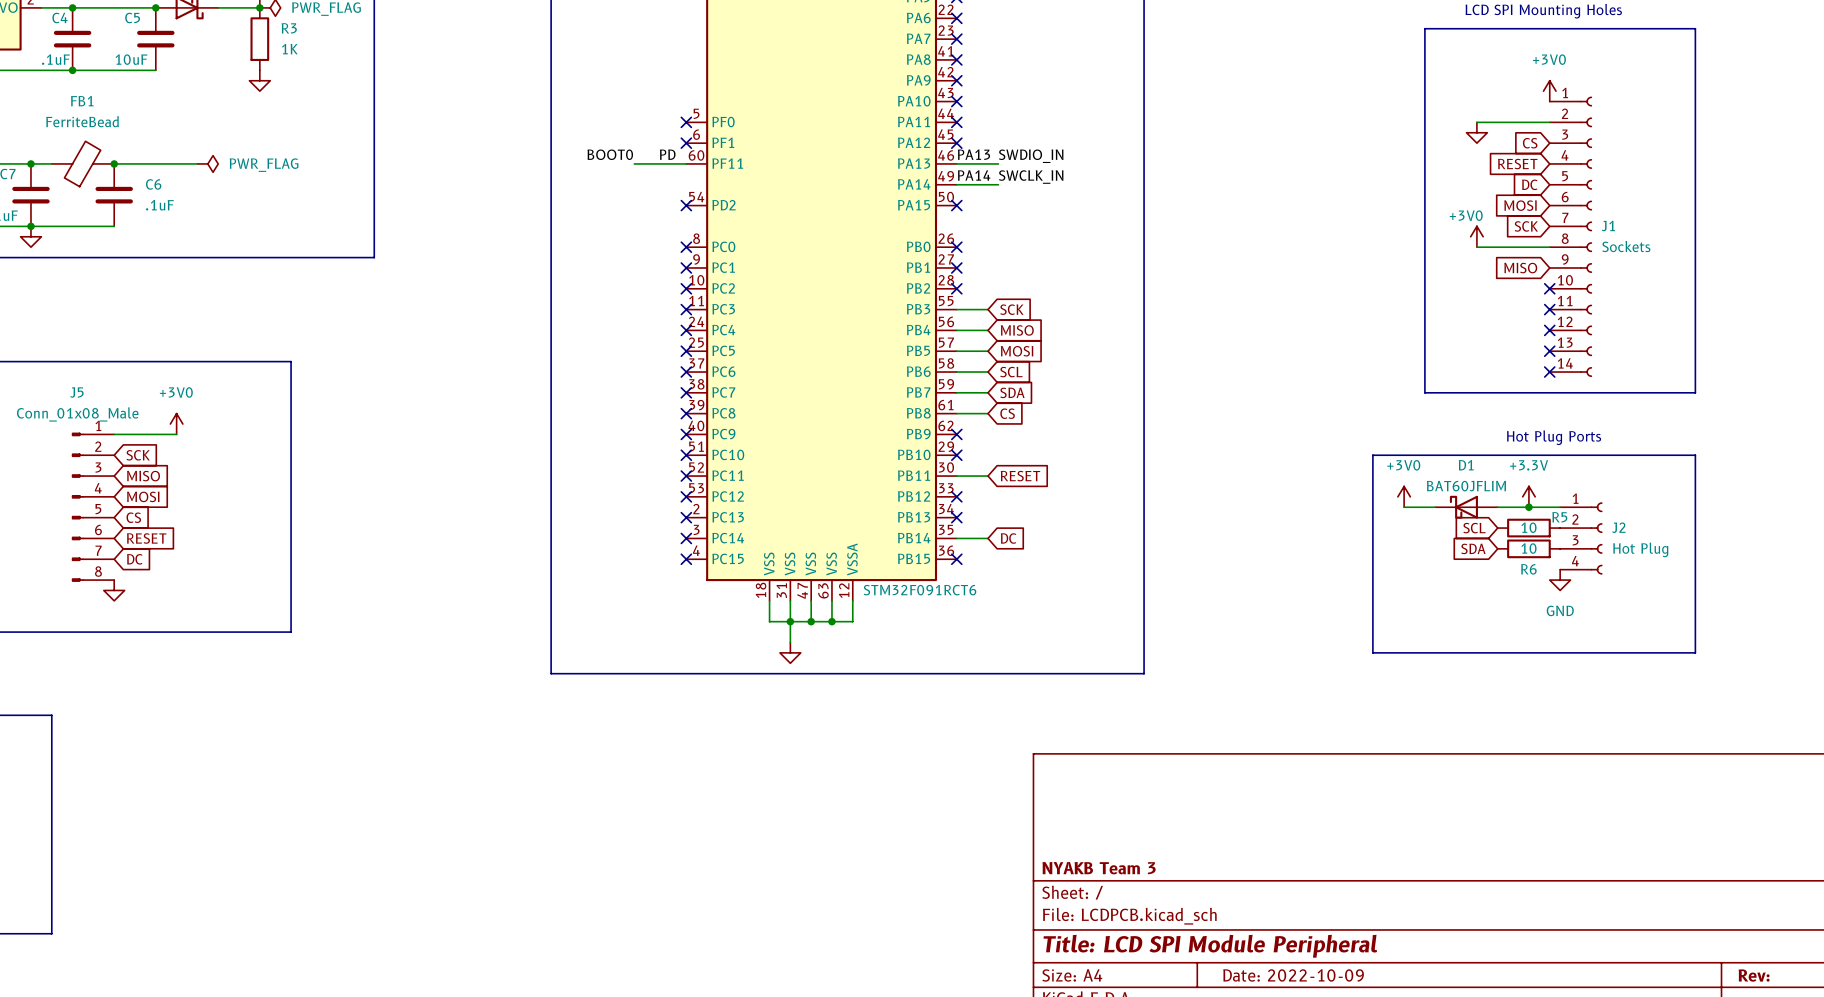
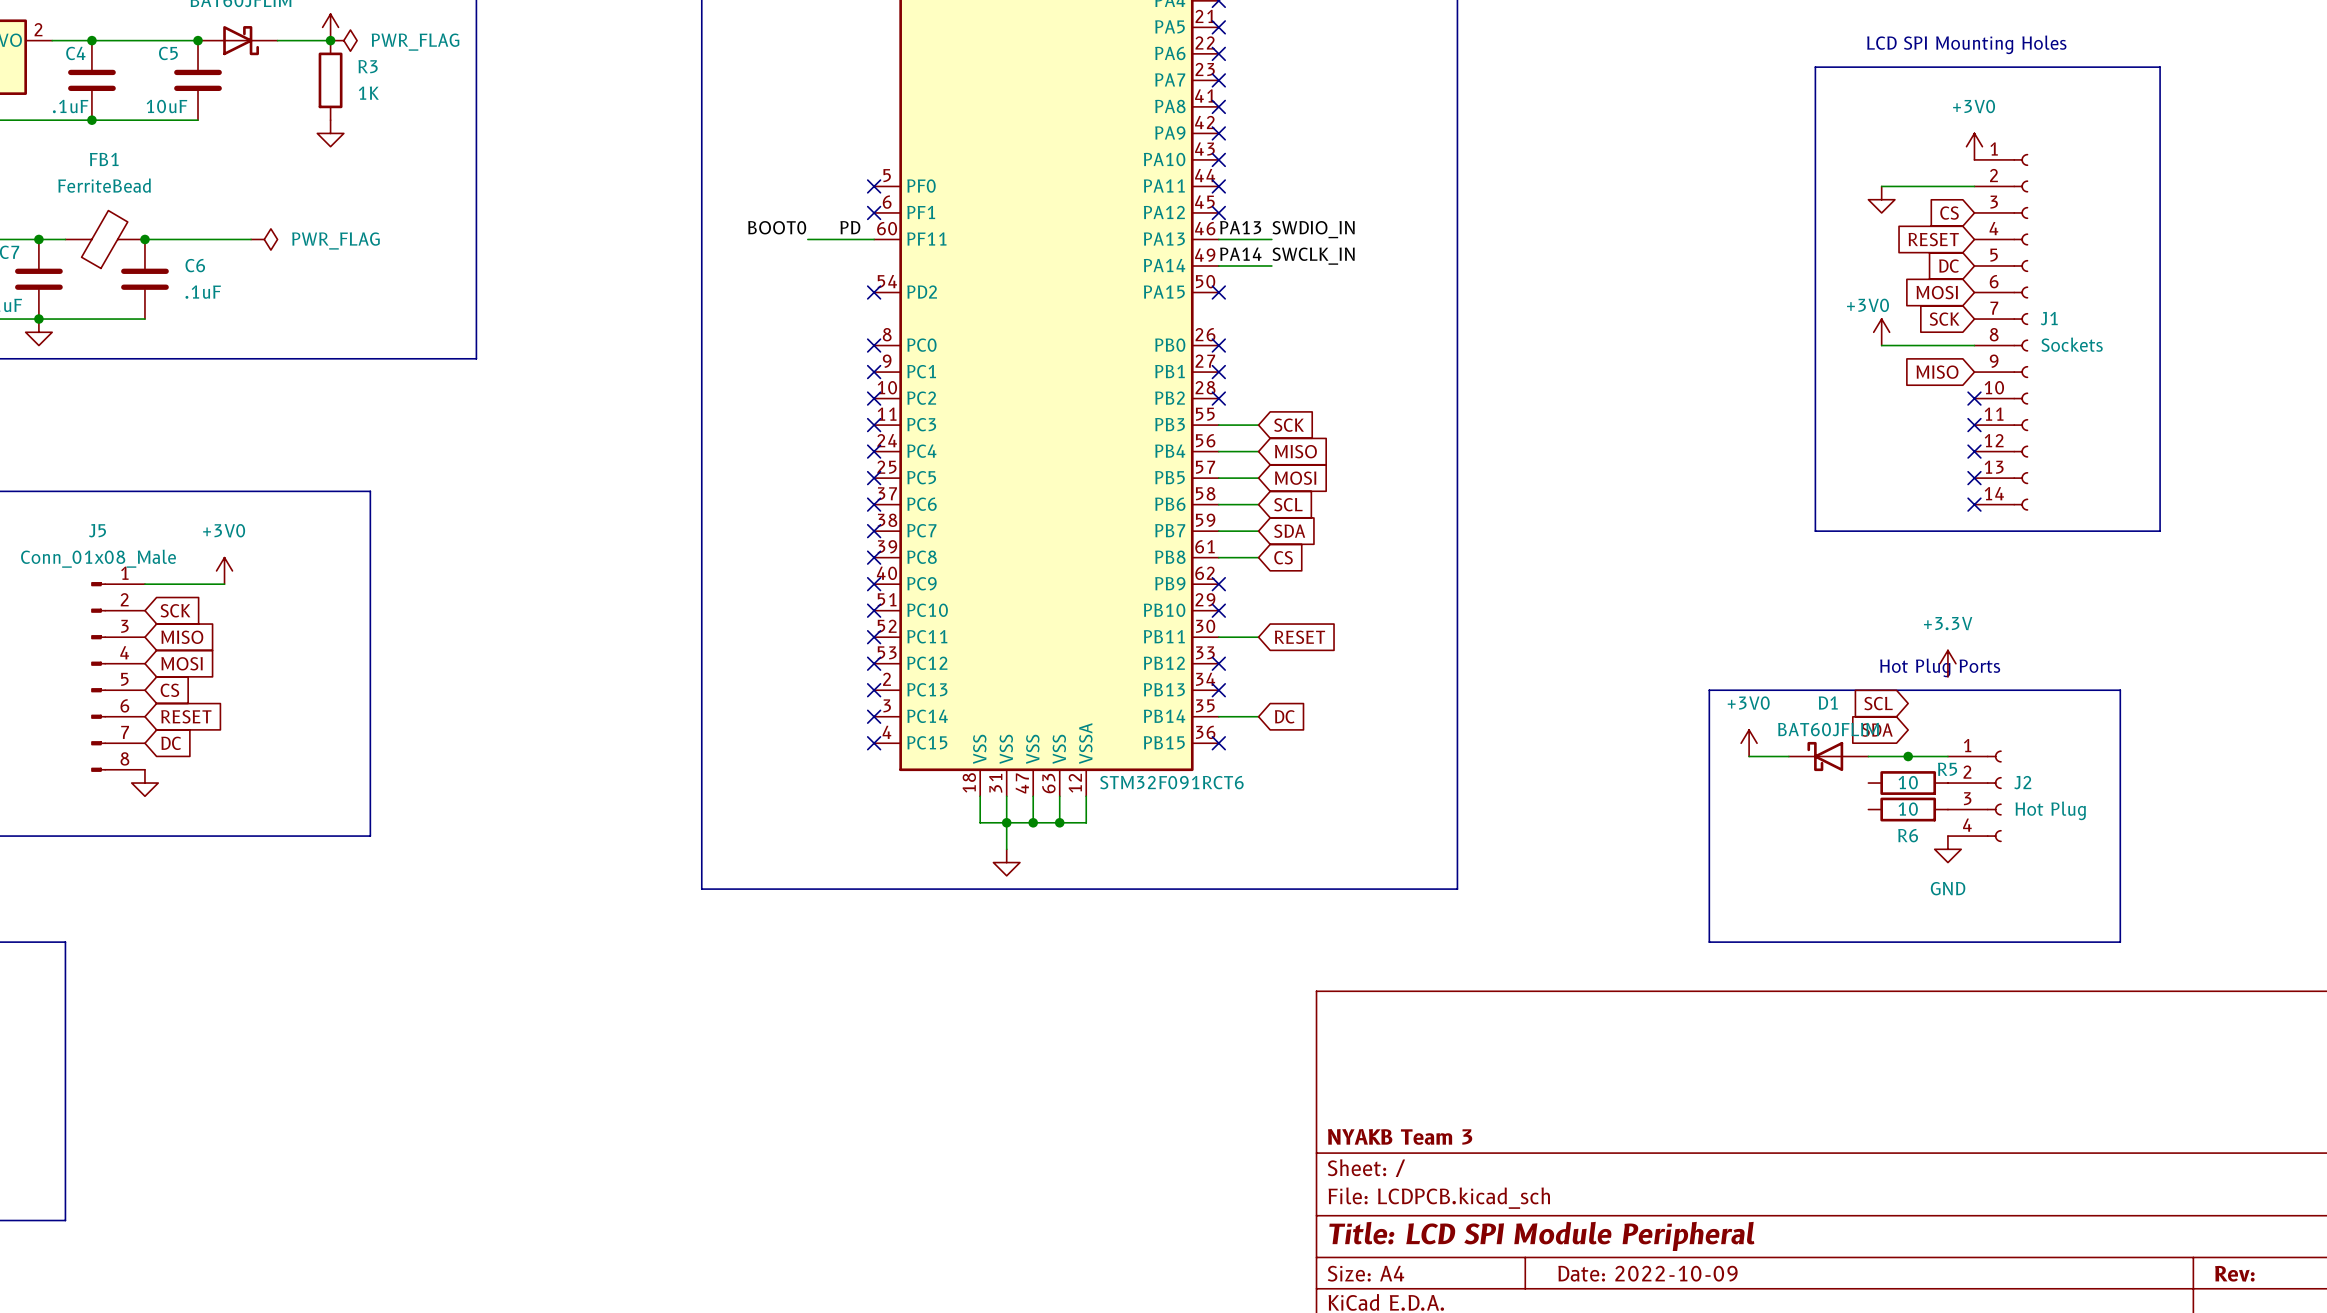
text position: Hot Plug Ports (1554, 437) -> Hot Plug Ports (1940, 667)
line: (1372, 455) (1372, 652) (1695, 652) (1695, 455) (1372, 455) -> (1709, 690) (1709, 942) (2120, 942) (2120, 690) (1709, 690)
power symbol position: +3V0 (1404, 496) -> +3V0 (1749, 743)
wire: (1404, 507) (1435, 507) -> (1749, 756) (1788, 756)
D1 position: (1466, 507) -> (1828, 756)
wire: (1497, 507) (1560, 507) -> (1868, 756) (1947, 756)
junction: (1528, 507) -> none
R5 position: (1528, 528) -> (1908, 783)
J2 position: (1581, 538) -> (1974, 796)
R6 position: (1528, 548) -> (1908, 809)
junction: none -> (1908, 756)
power symbol position: GND (1560, 580) -> GND (1947, 849)

